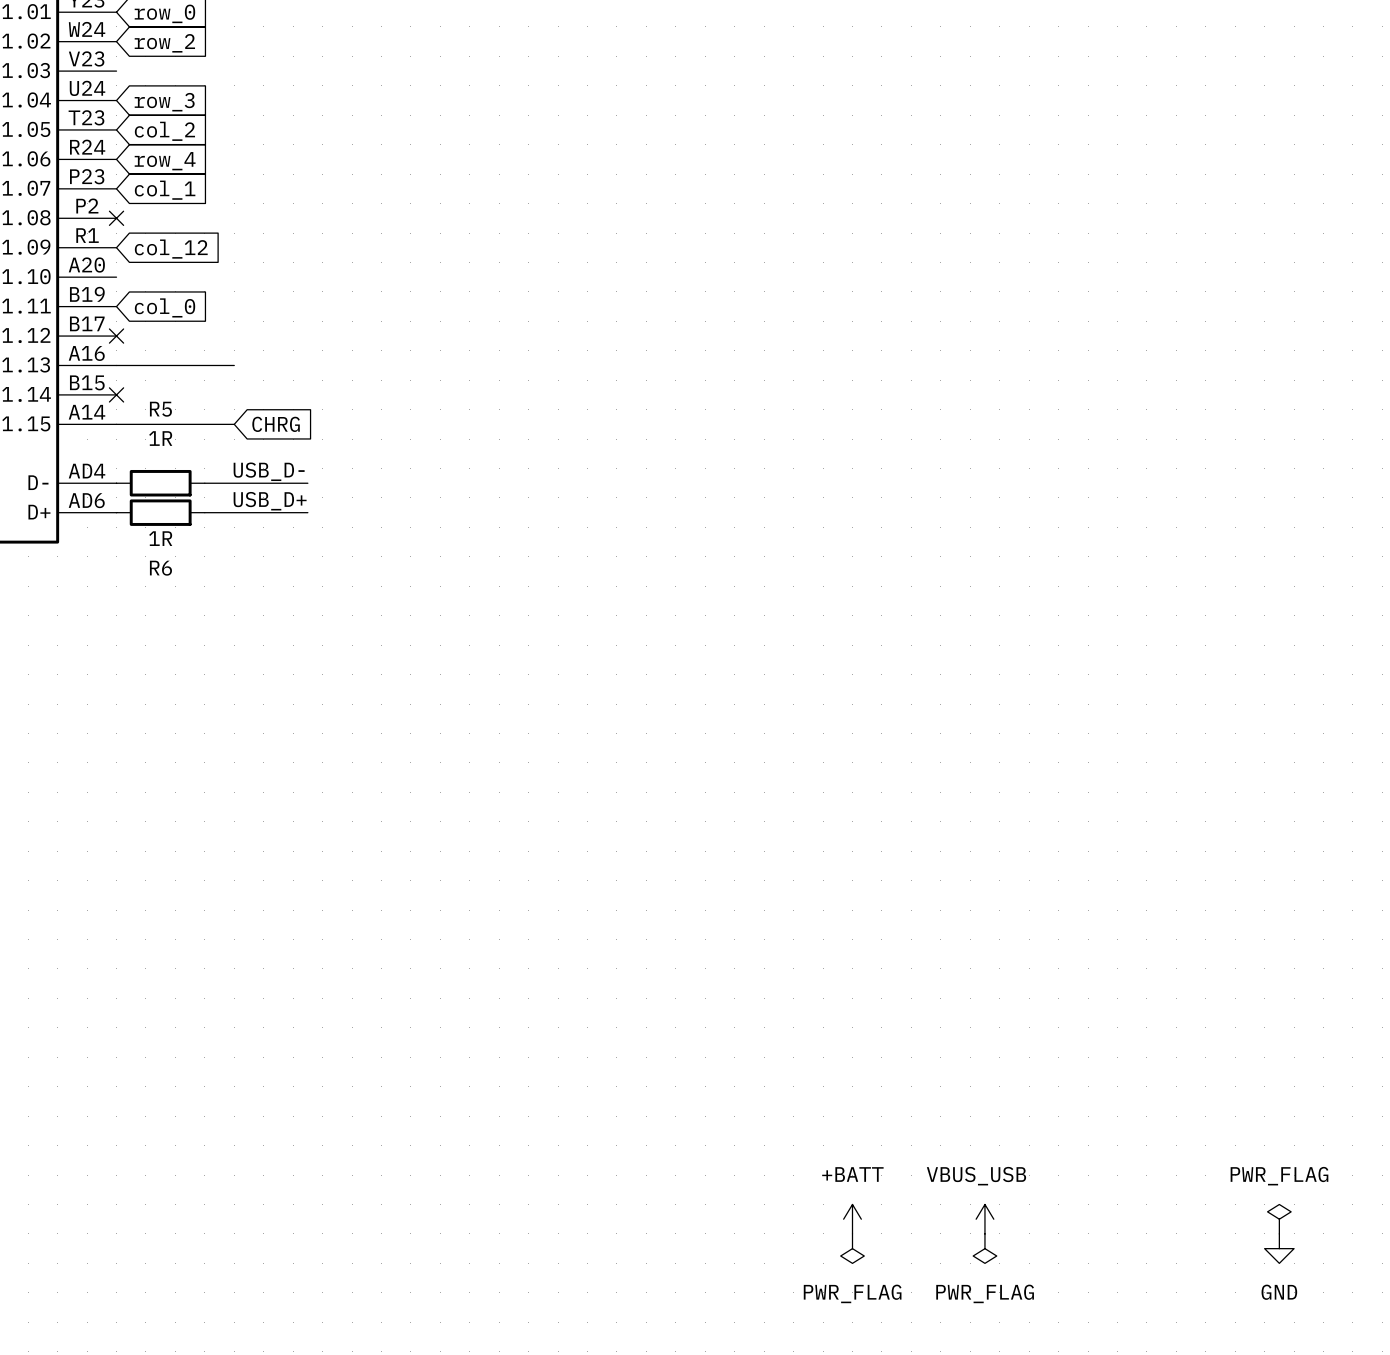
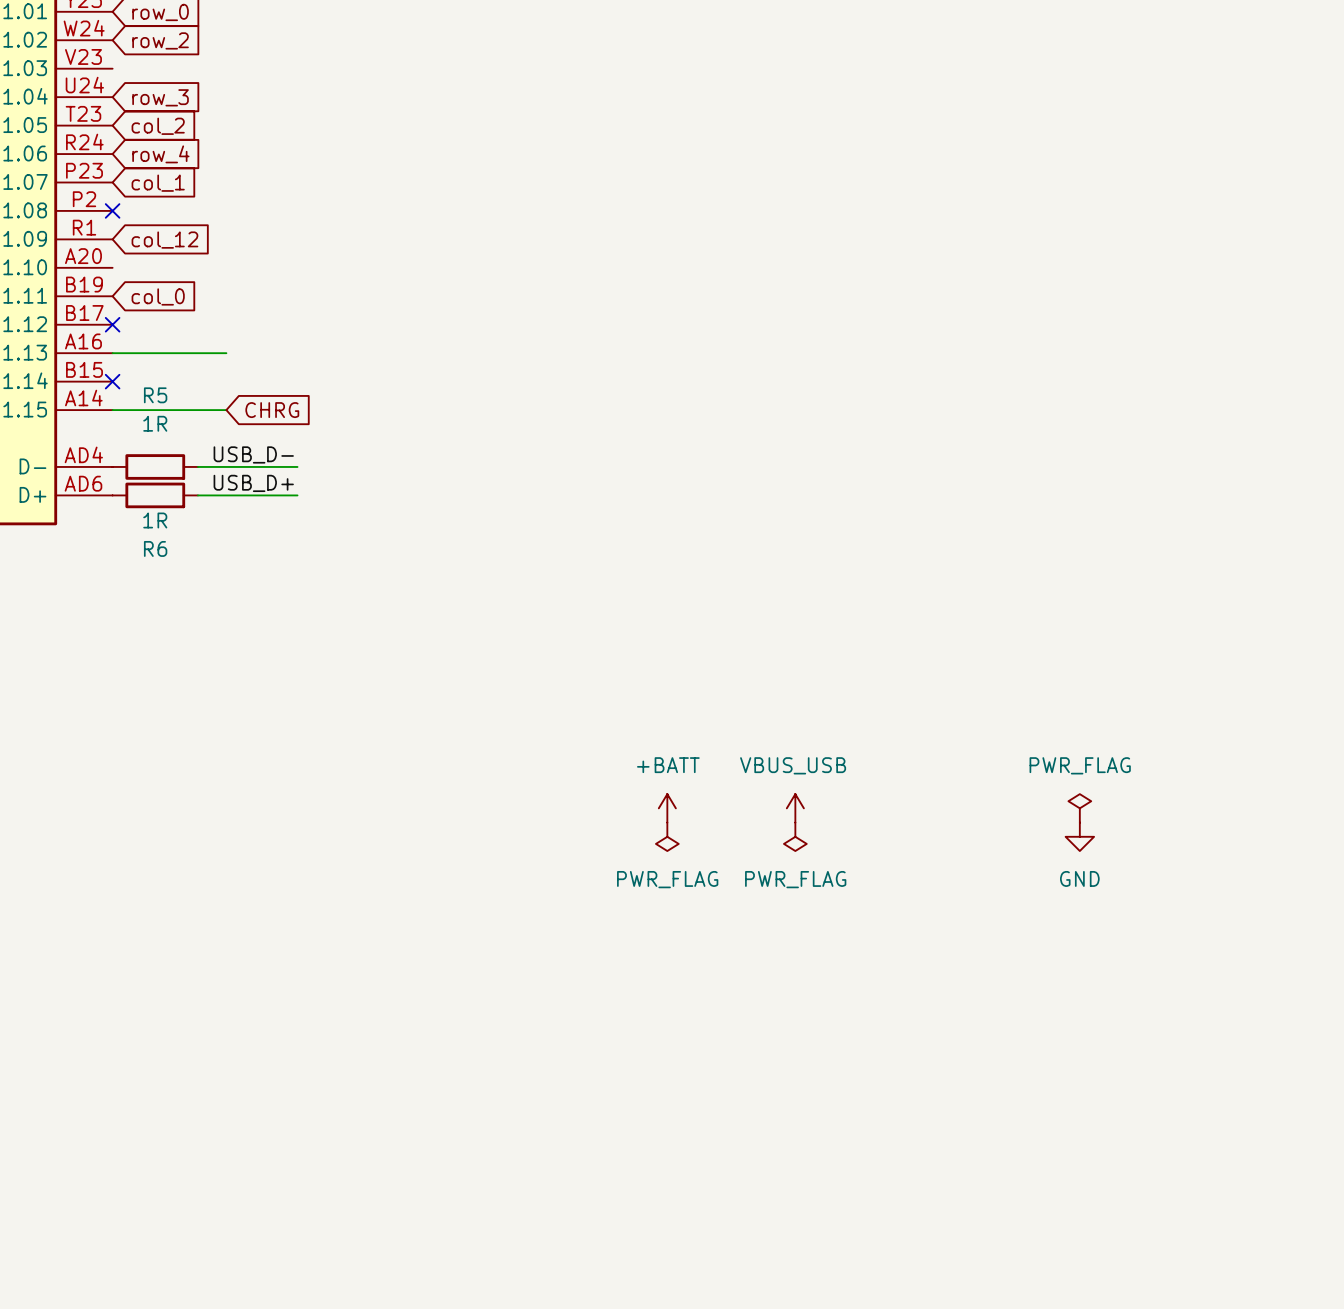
power symbol: none -> +BATT (667, 808)
power symbol: none -> VBUS_USB (795, 808)
power symbol: none -> PWR_FLAG (1079, 808)
power symbol: none -> PWR_FLAG (667, 836)
power symbol: none -> PWR_FLAG (795, 836)
power symbol: none -> GND (1079, 836)
power symbol: +BATT (852, 1219) -> none
power symbol: VBUS_USB (984, 1219) -> none
power symbol: PWR_FLAG (1279, 1219) -> none
power symbol: PWR_FLAG (852, 1248) -> none
power symbol: PWR_FLAG (984, 1248) -> none
power symbol: GND (1279, 1248) -> none

